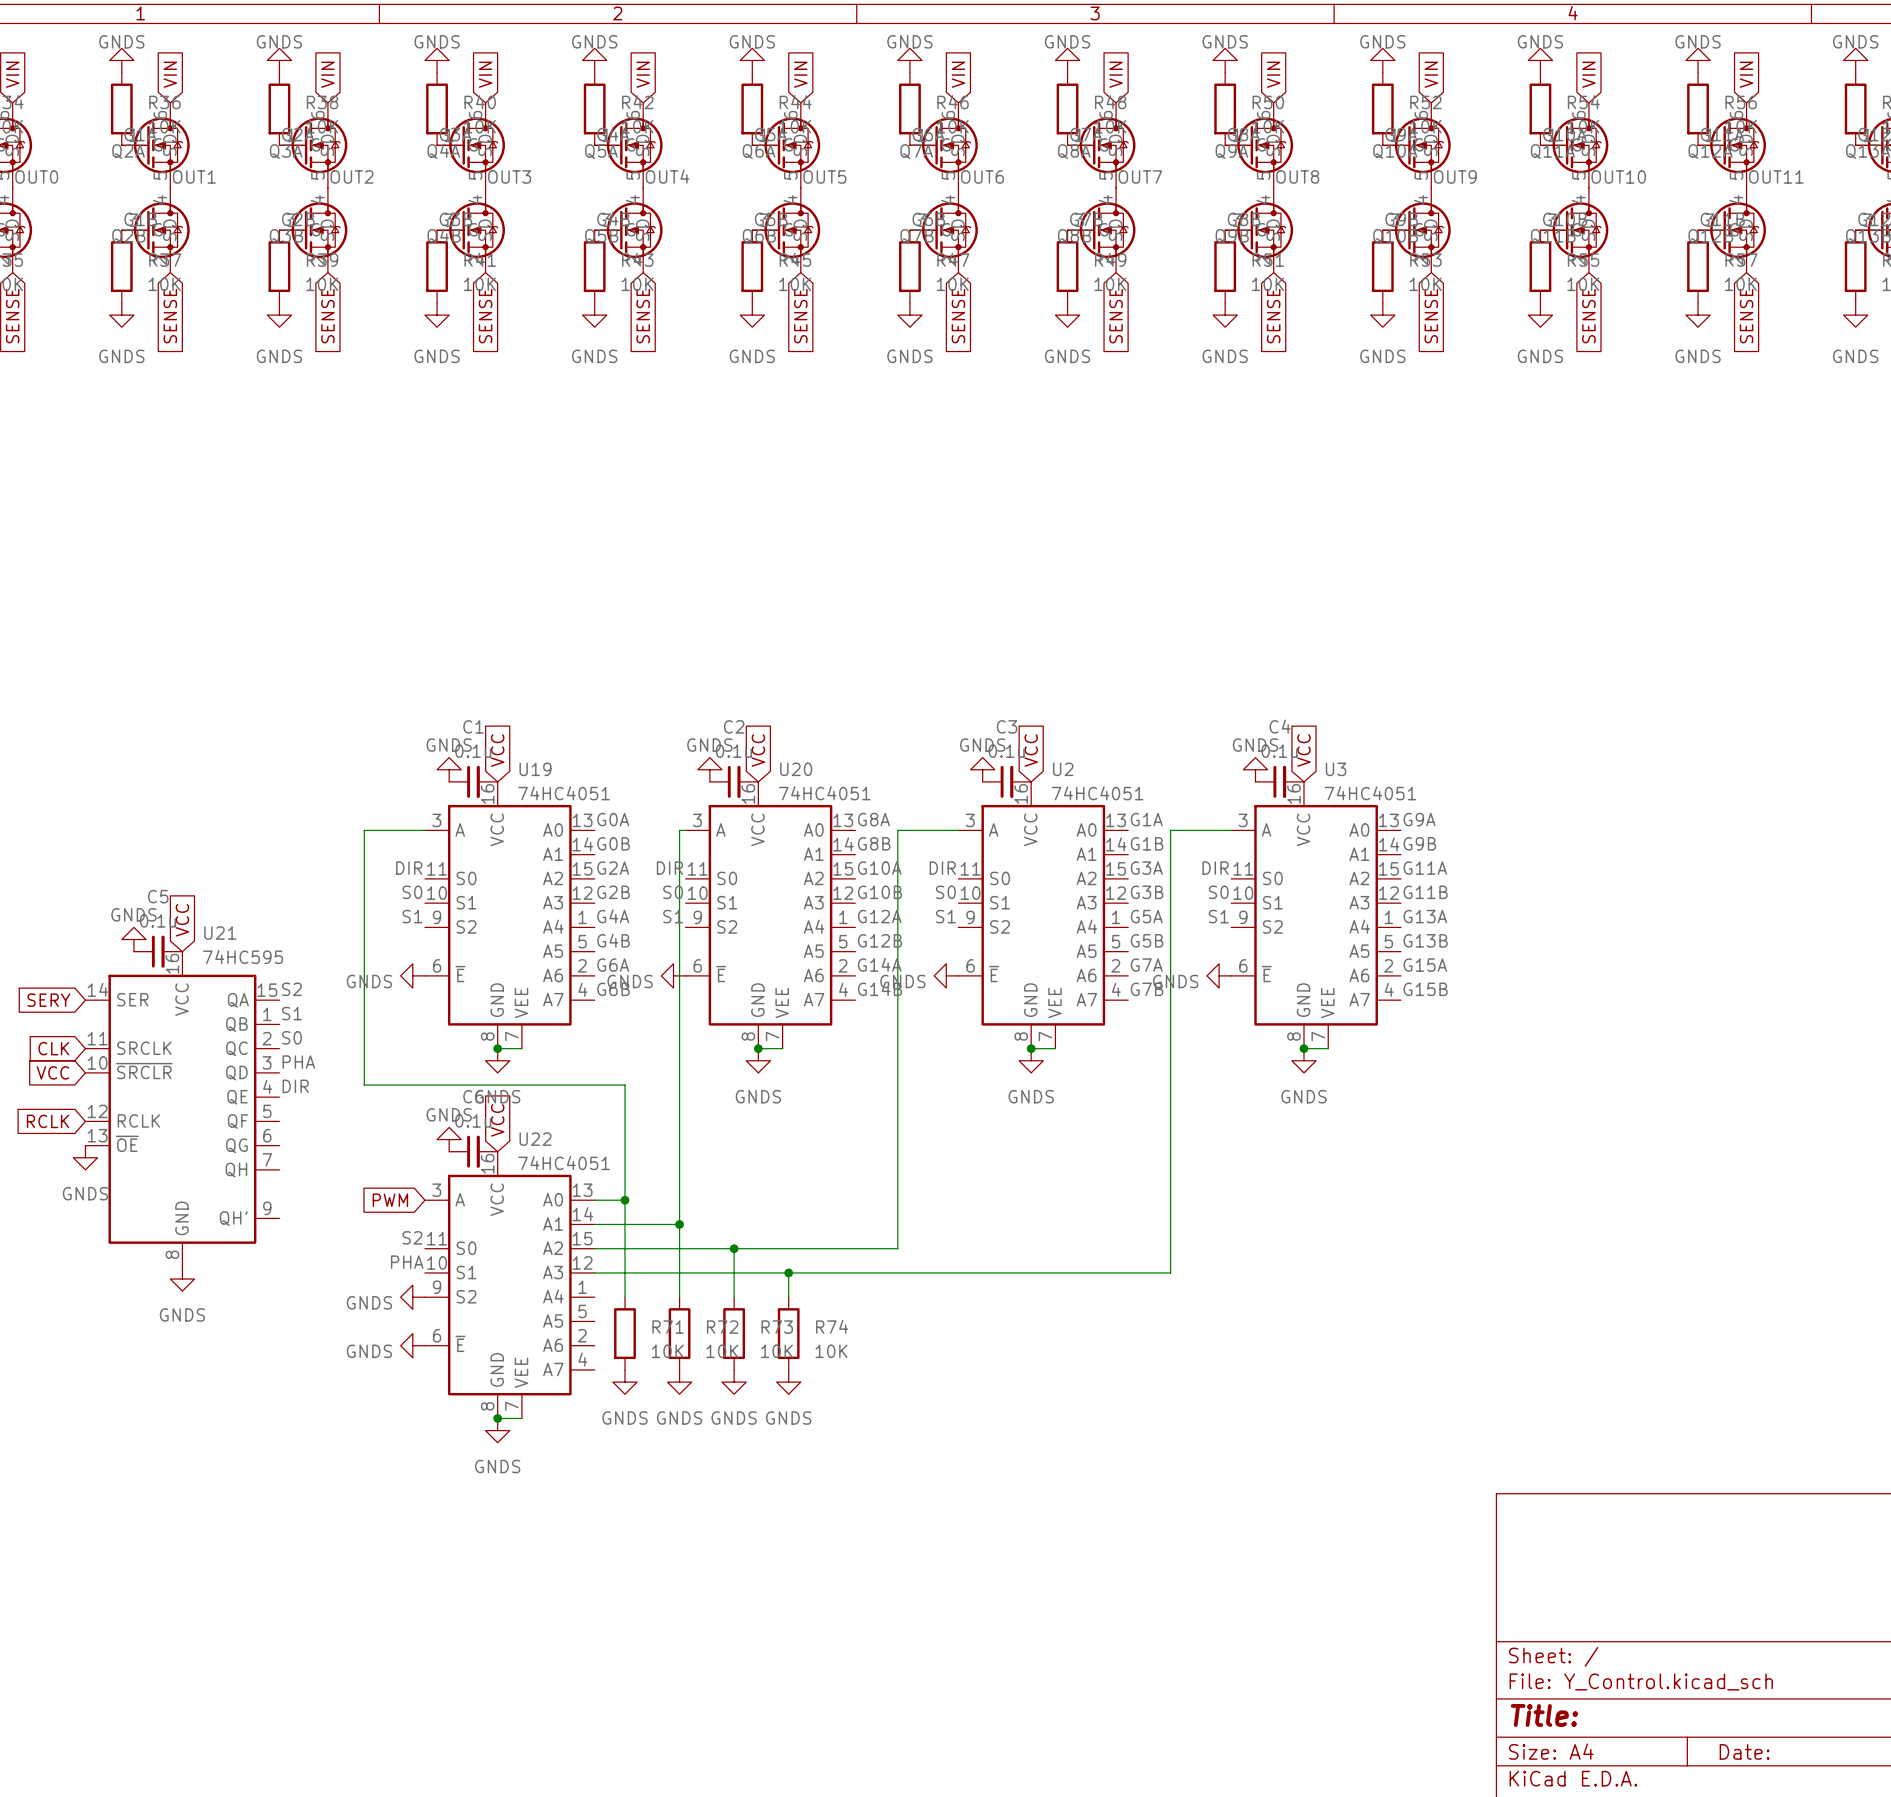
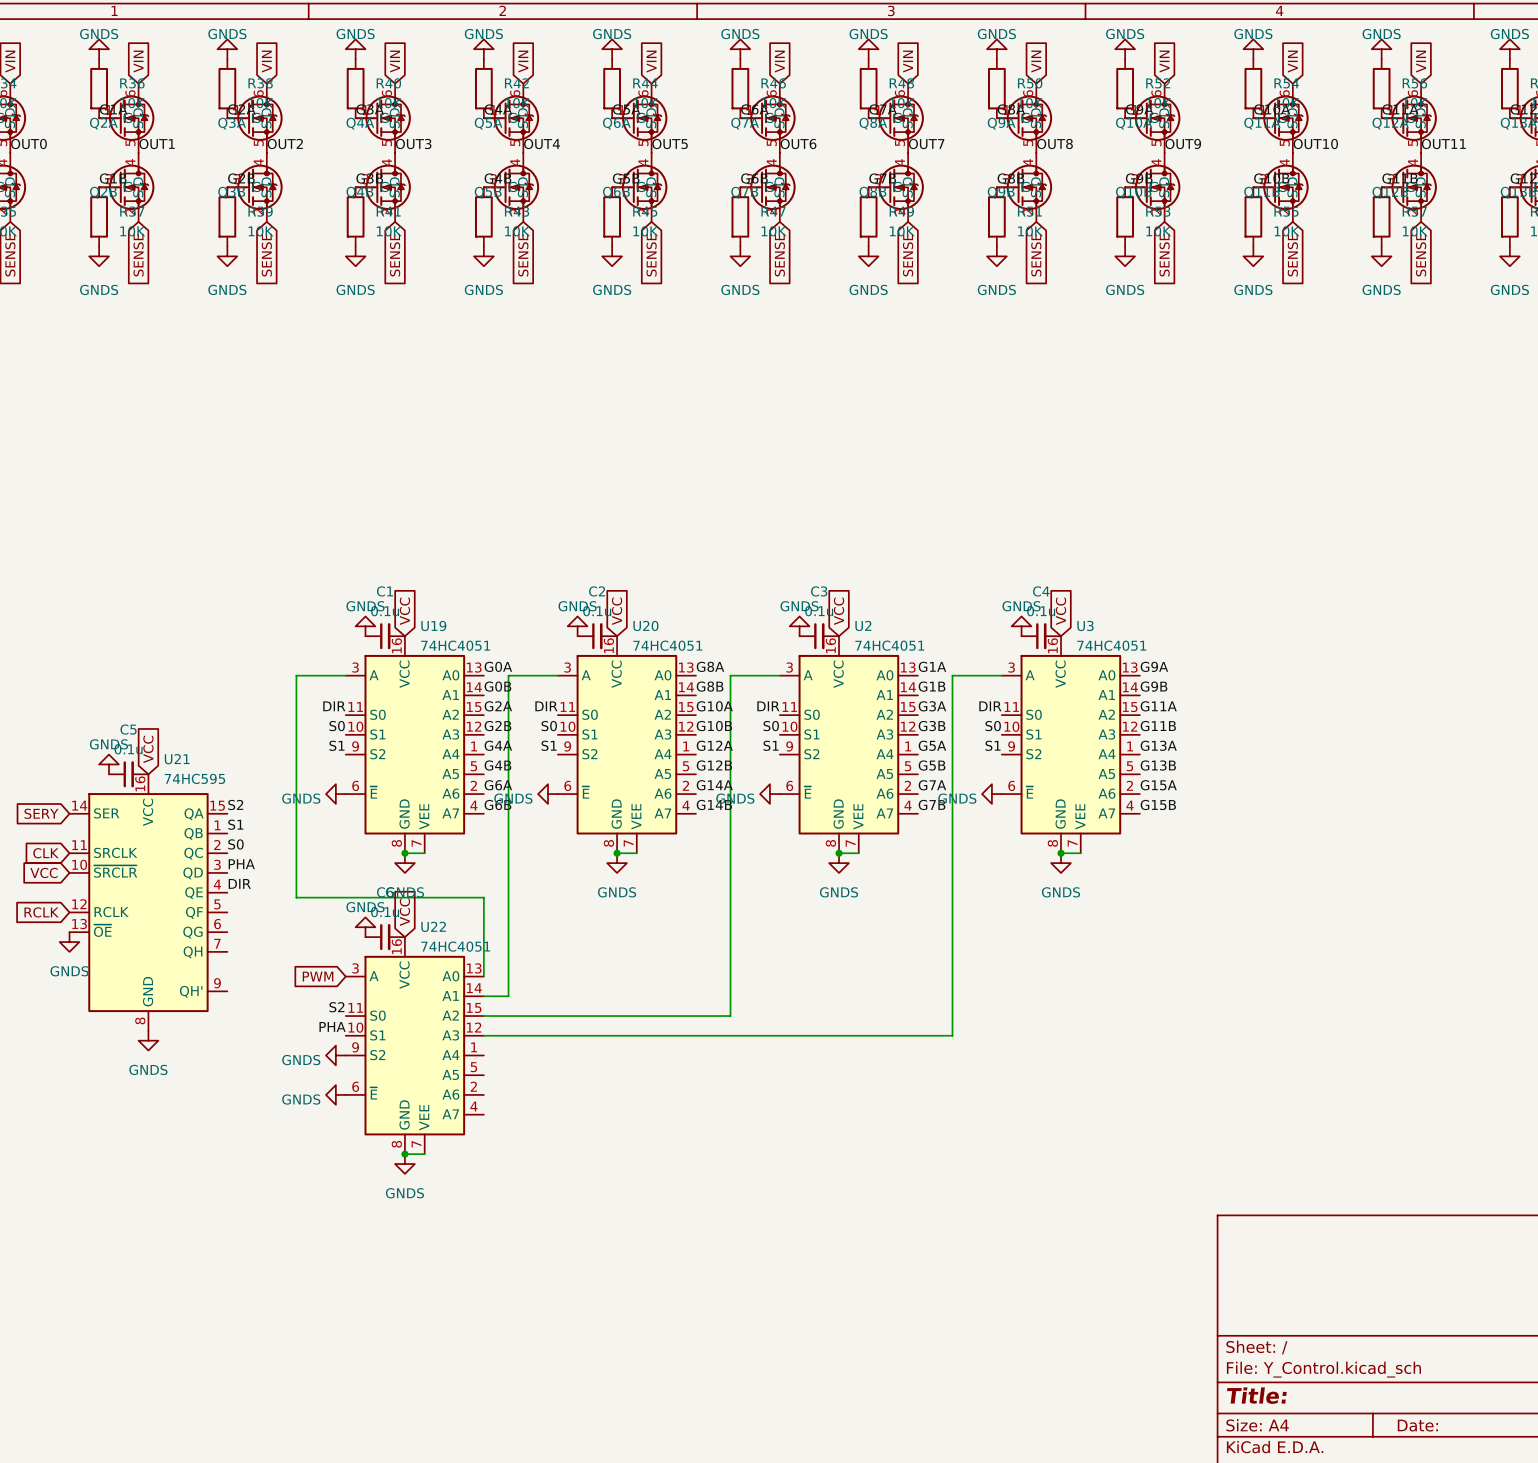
wire: (679, 830) (679, 1297) -> (552, 675) (508, 675) (508, 882)
wire: (364, 1085) (625, 1085) -> (296, 882) (296, 897) (483, 897) (483, 976)
wire: (594, 1200) (625, 1200) -> none
junction: (625, 1200) -> none
wire: (679, 1224) (625, 1224) (625, 1297) -> none
junction: (679, 1224) -> none
wire: (734, 1248) (734, 1297) -> none
junction: (734, 1248) -> none
wire: (788, 1272) (788, 1297) -> none
junction: (788, 1272) -> none
R71: 10K (625, 1333) -> none
R72: 10K (679, 1333) -> none
R73: 10K (734, 1333) -> none
R74: 10K (788, 1333) -> none
power symbol: GNDS (625, 1382) -> none
power symbol: GNDS (679, 1382) -> none
power symbol: GNDS (734, 1382) -> none
power symbol: GNDS (788, 1382) -> none

